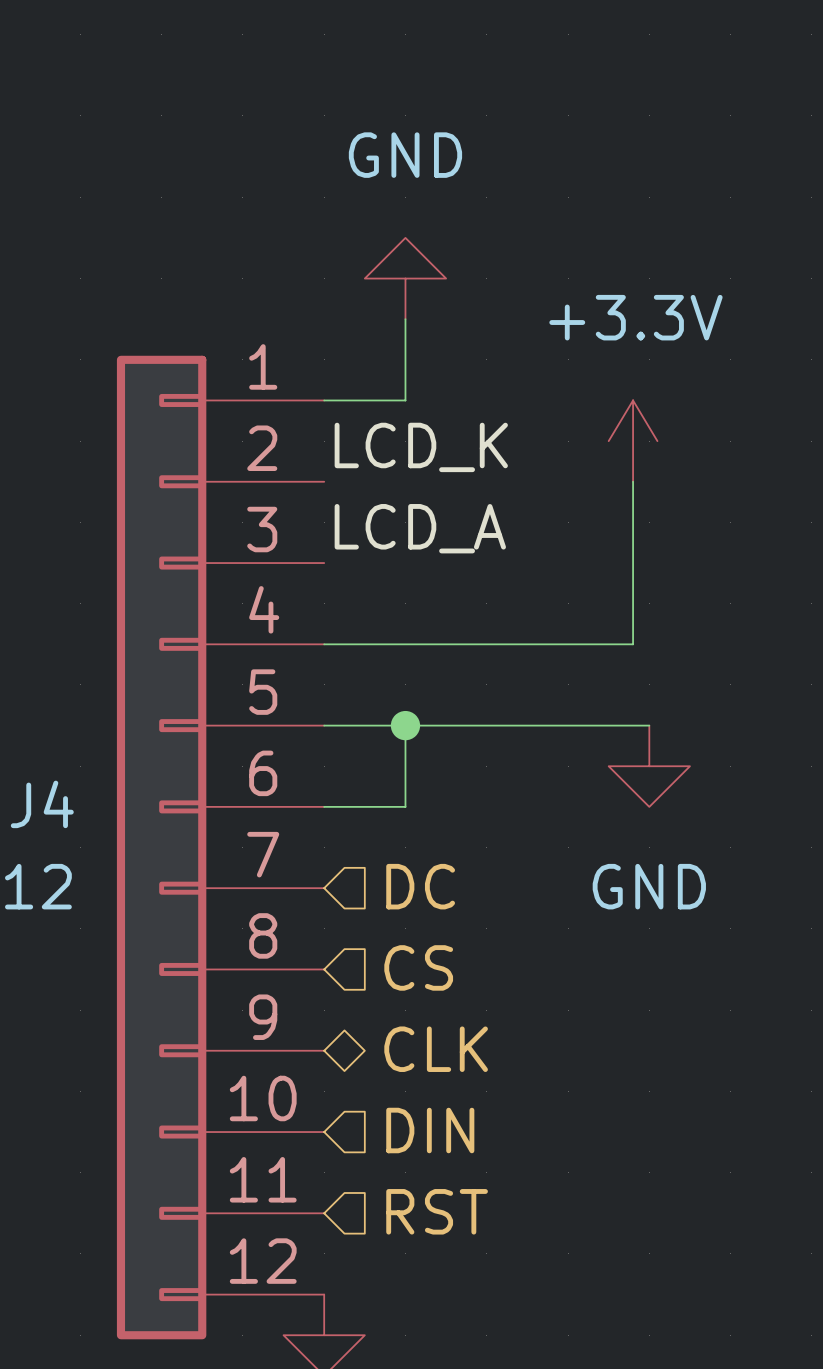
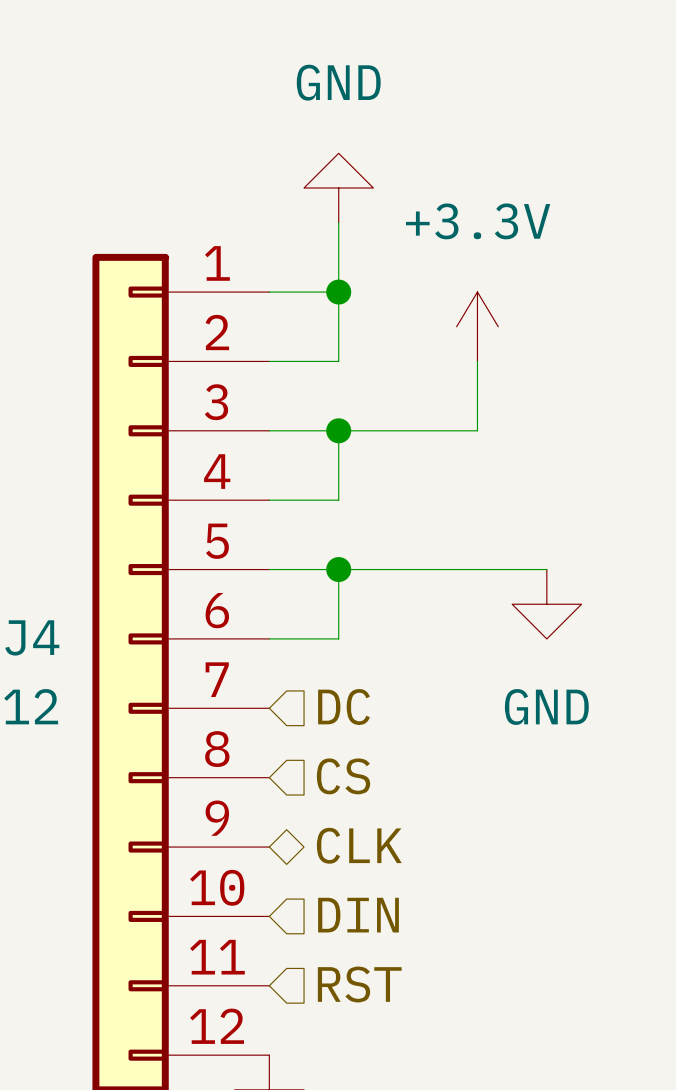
wire: none -> (338, 292) (338, 361) (269, 361)
junction: none -> (338, 292)
power symbol position: +3.3V (633, 441) -> +3.3V (477, 326)
label: LCD_K (421, 447) -> none
wire: none -> (477, 361) (477, 430) (269, 430)
wire: (633, 481) (633, 644) (405, 644) -> (338, 430) (338, 500)
label: LCD_A (420, 528) -> none
junction: none -> (338, 430)

